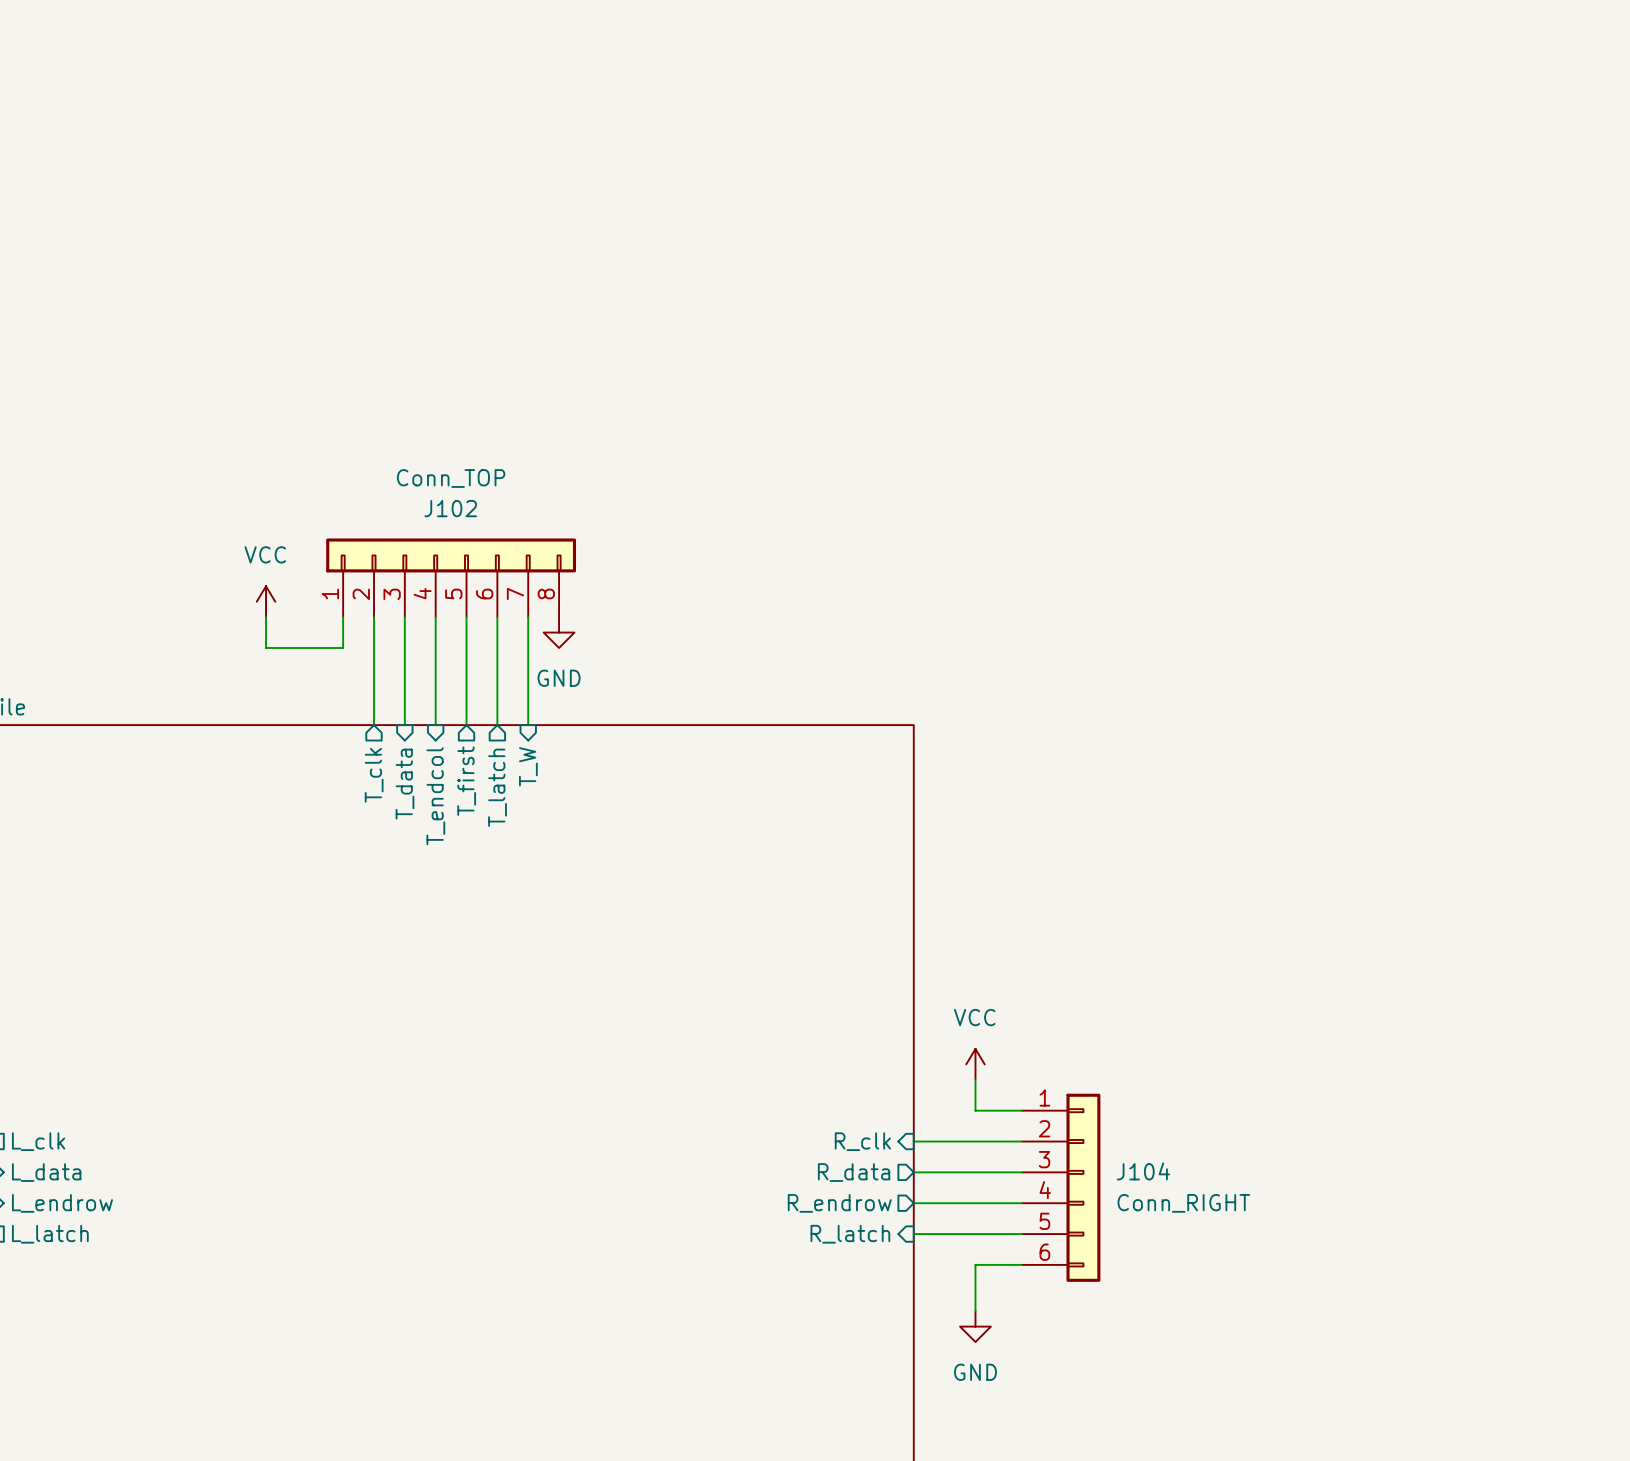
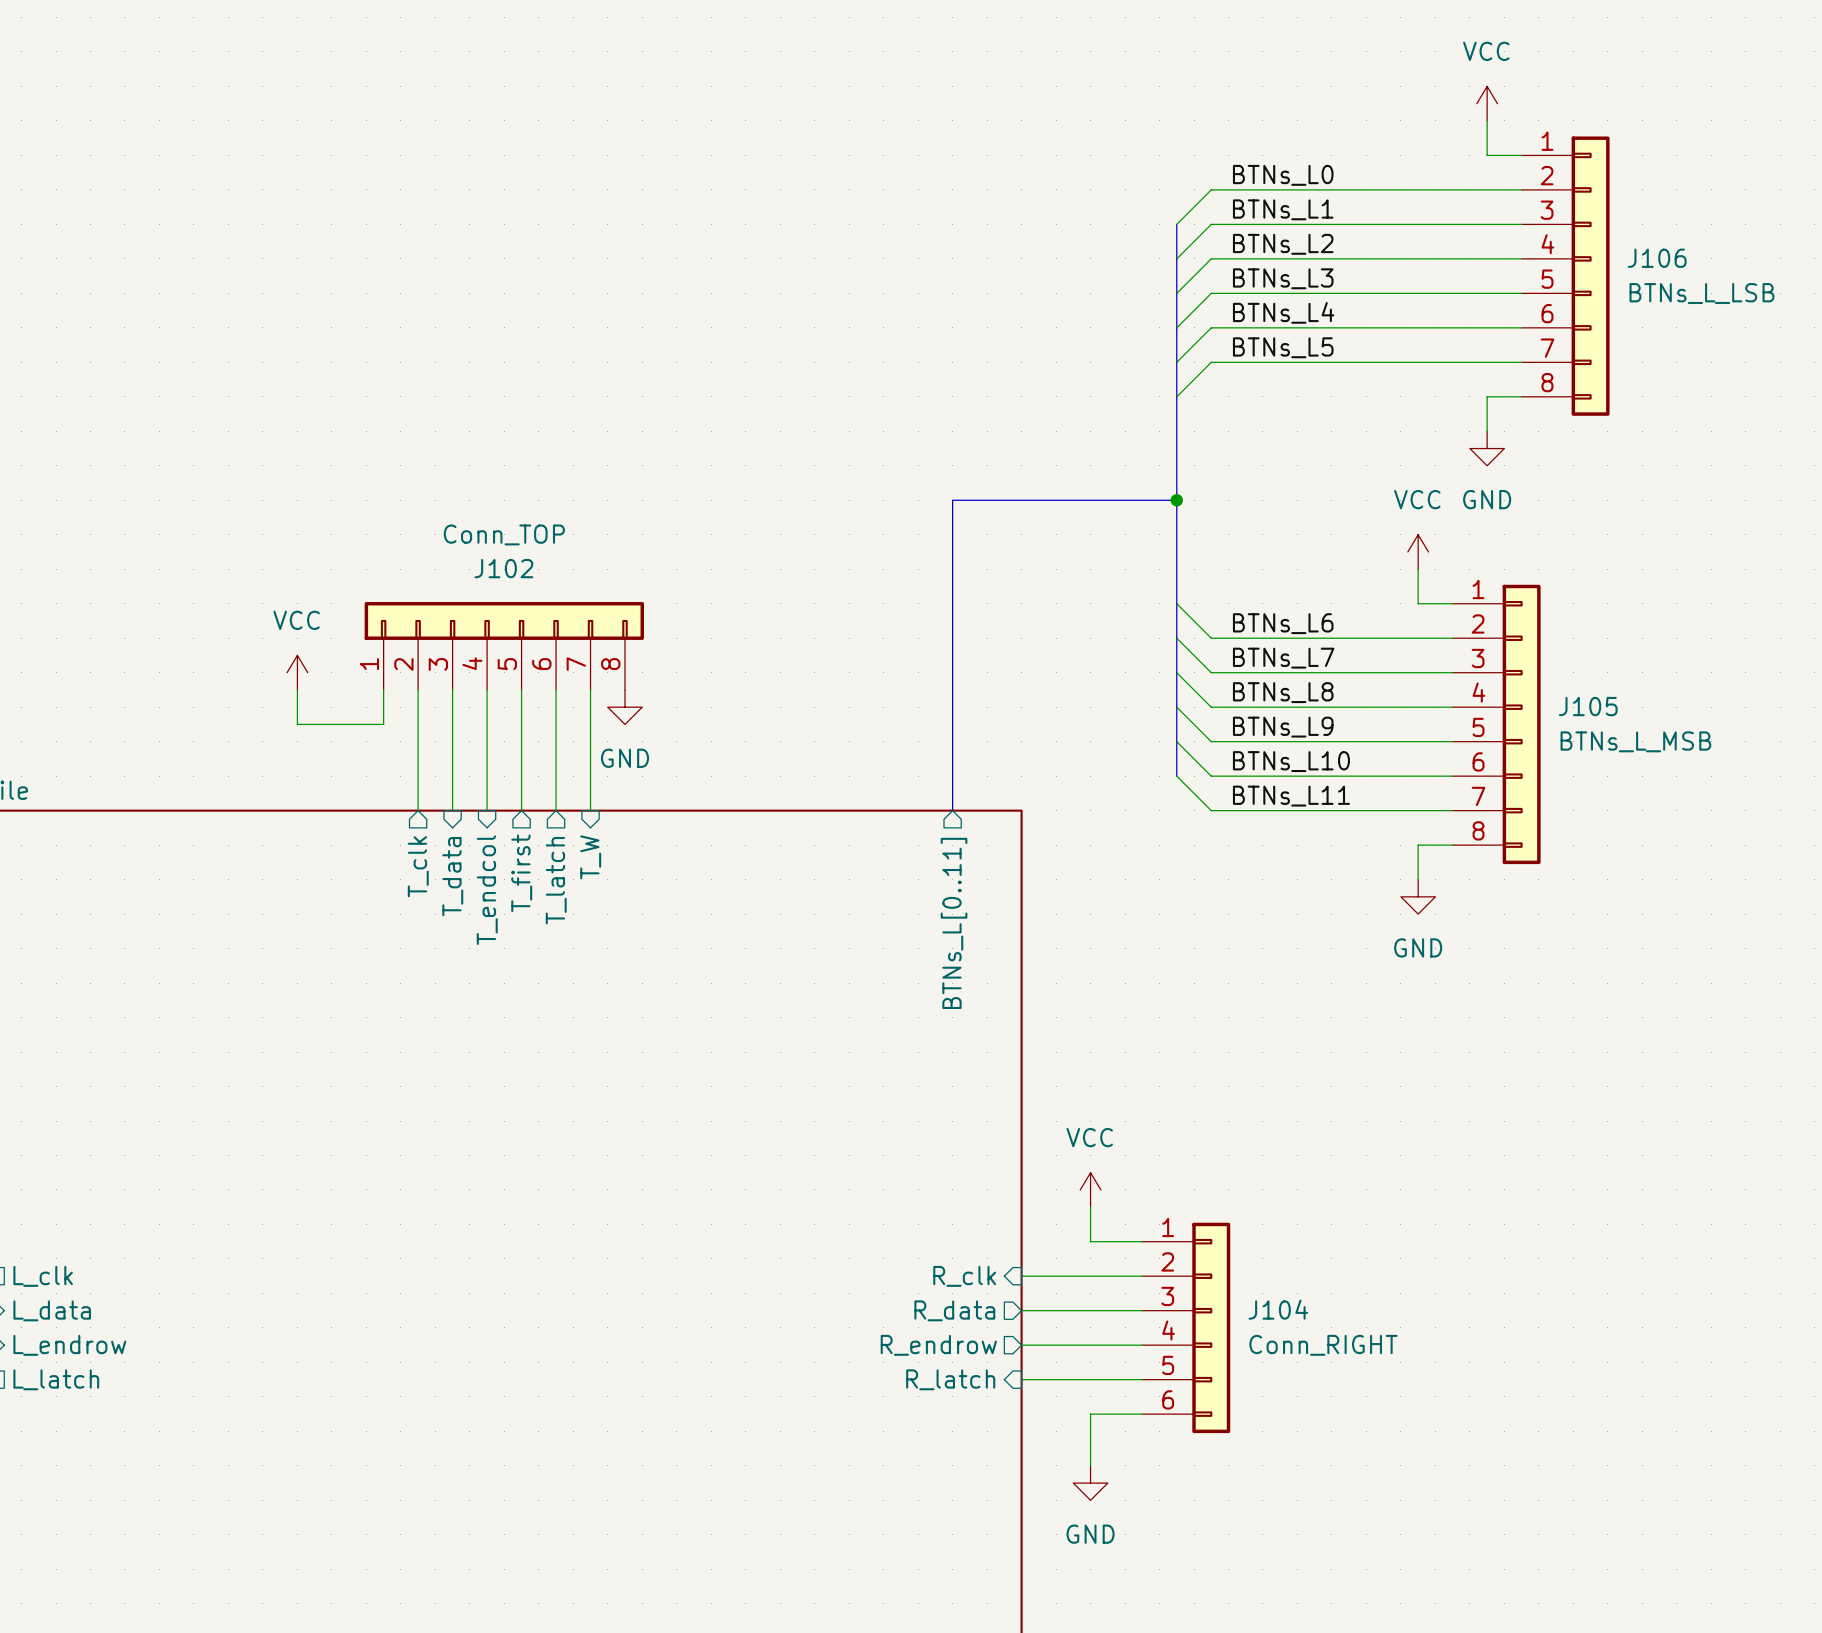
power symbol: none -> VCC (1487, 103)
wire: none -> (1487, 120) (1487, 155) (1521, 155)
label: none -> BTNs_L0 (1283, 175)
wire: none -> (1521, 189) (1211, 189) (1176, 224)
label: none -> BTNs_L1 (1283, 209)
bus: none -> (1176, 224) (1176, 776)
wire: none -> (1521, 224) (1211, 224) (1176, 258)
label: none -> BTNs_L2 (1283, 244)
wire: none -> (1521, 258) (1211, 258) (1176, 293)
J106: none -> BTNs_L_LSB (1565, 276)
label: none -> BTNs_L3 (1283, 278)
wire: none -> (1521, 293) (1211, 293) (1176, 327)
label: none -> BTNs_L4 (1283, 312)
wire: none -> (1521, 327) (1211, 327) (1176, 362)
label: none -> BTNs_L5 (1283, 347)
wire: none -> (1521, 362) (1211, 362) (1176, 396)
wire: none -> (1521, 396) (1487, 396) (1487, 431)
power symbol: none -> GND (1487, 448)
bus: none -> (1176, 500) (952, 500) (952, 810)
junction: none -> (1176, 500)
power symbol: none -> VCC (1418, 552)
wire: none -> (1418, 569) (1418, 603) (1452, 603)
wire: none -> (1176, 603) (1211, 638) (1452, 638)
label: none -> BTNs_L6 (1283, 623)
wire: none -> (1176, 638) (1211, 672) (1452, 672)
label: none -> BTNs_L7 (1283, 658)
wire: none -> (1176, 672) (1211, 707) (1452, 707)
label: none -> BTNs_L8 (1283, 692)
wire: none -> (1176, 707) (1211, 741) (1452, 741)
J105: none -> BTNs_L_MSB (1496, 724)
label: none -> BTNs_L9 (1283, 727)
wire: none -> (1176, 741) (1211, 776) (1452, 776)
label: none -> BTNs_L10 (1291, 761)
wire: none -> (1176, 776) (1211, 810) (1452, 810)
label: none -> BTNs_L11 (1291, 796)
wire: none -> (1452, 845) (1418, 845) (1418, 879)
power symbol: none -> GND (1418, 896)
sheet pin: none -> BTNs_L[0..11] (954, 923)

